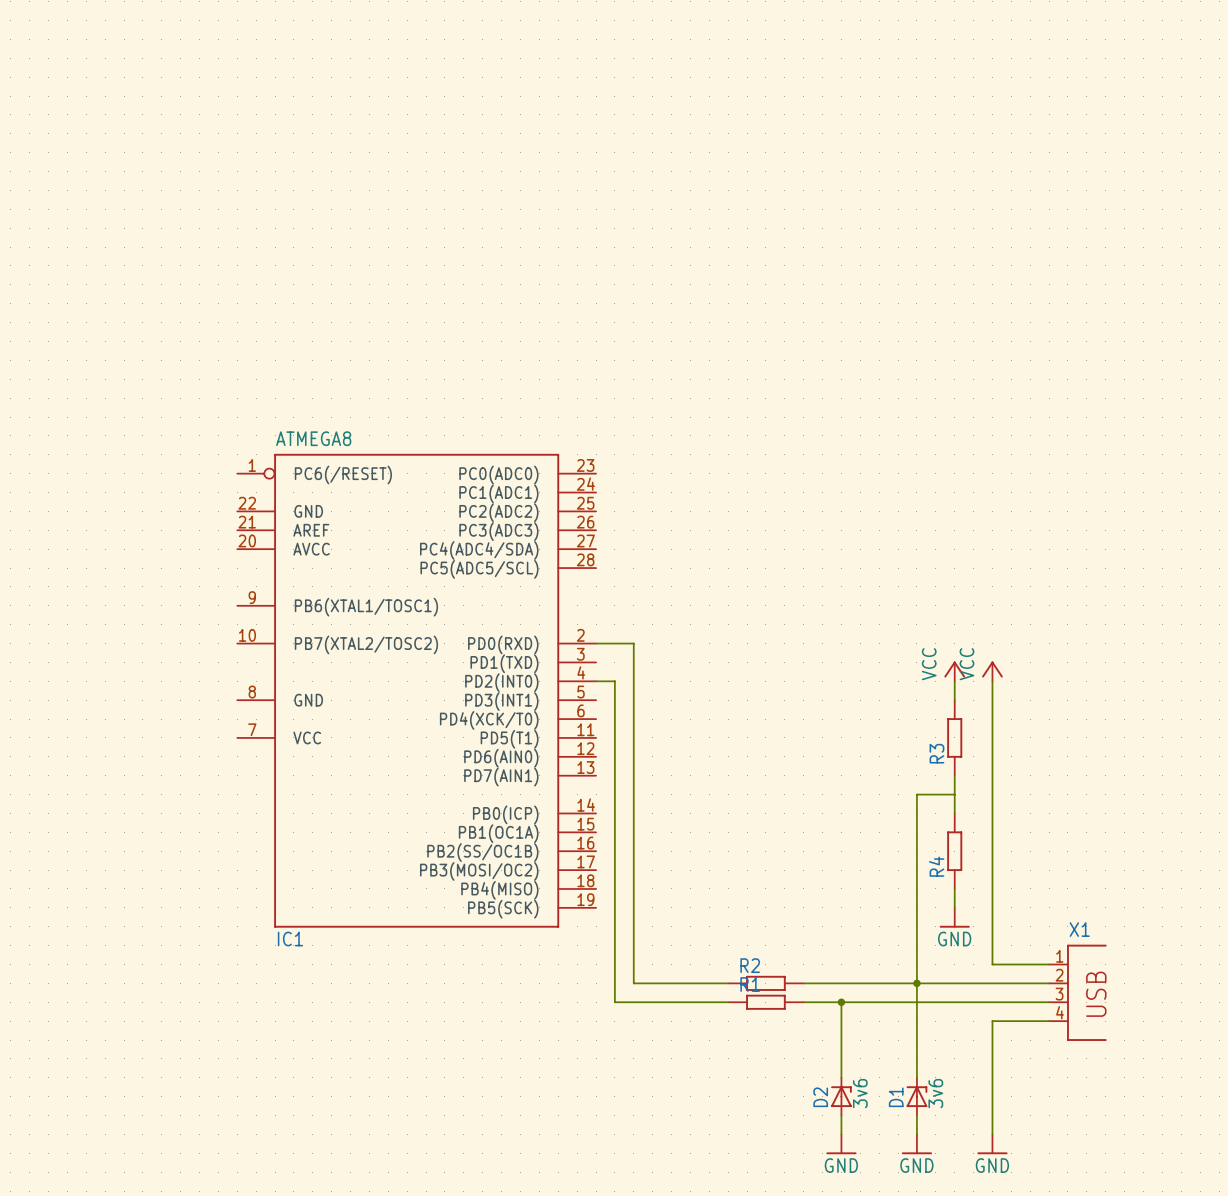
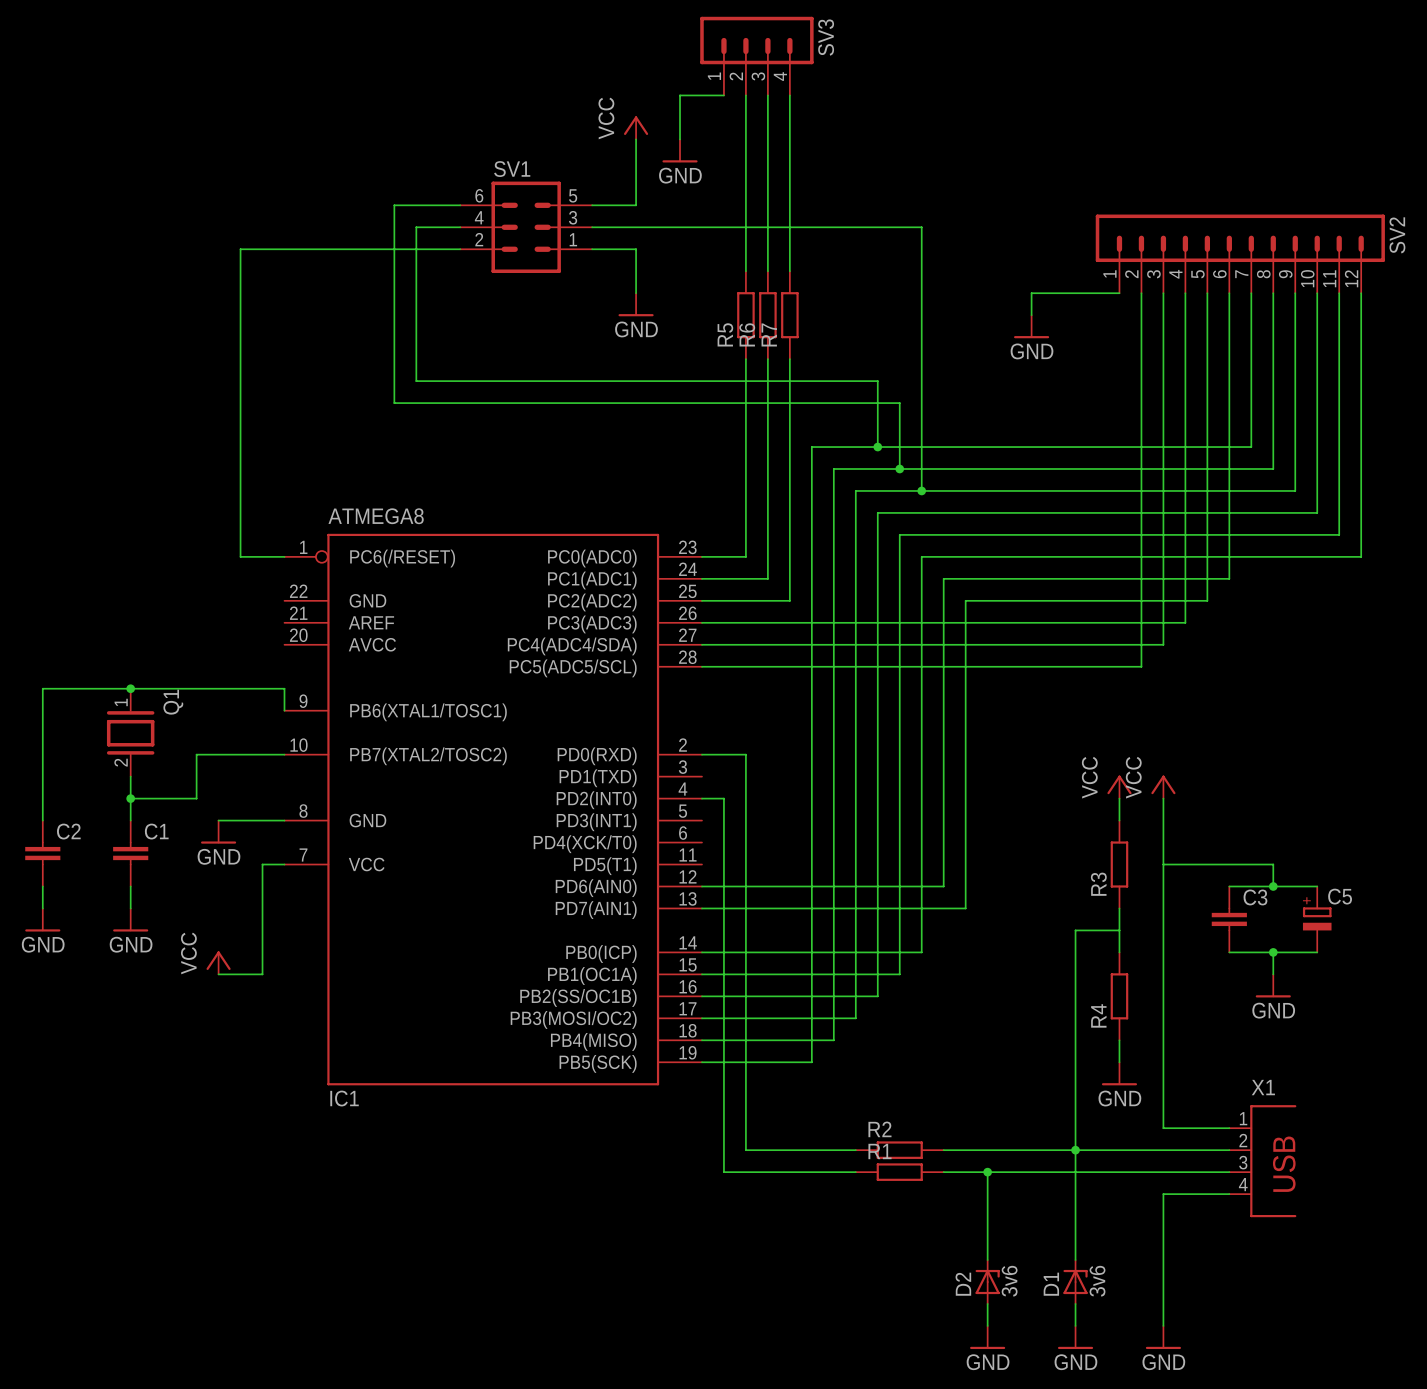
SV3: none -> (756, 56)
wire: none -> (723, 95) (680, 95) (680, 139)
wire: none -> (745, 95) (745, 271)
wire: none -> (767, 95) (767, 271)
wire: none -> (789, 95) (789, 271)
power symbol: none -> VCC (636, 127)
wire: none -> (636, 139) (636, 205) (592, 205)
power symbol: none -> GND (680, 150)
wire: none -> (460, 205) (394, 205) (394, 403) (899, 403) (899, 469)
wire: none -> (460, 227) (416, 227) (416, 381) (877, 381) (877, 447)
SV1: none -> (526, 227)
wire: none -> (592, 227) (921, 227) (921, 490)
wire: none -> (460, 249) (240, 249) (240, 556) (284, 556)
wire: none -> (592, 249) (636, 249) (636, 293)
SV2: none -> (1240, 253)
wire: none -> (1119, 293) (1031, 293) (1031, 315)
wire: none -> (1141, 293) (1141, 666) (701, 666)
wire: none -> (1163, 293) (1163, 644) (701, 644)
wire: none -> (1185, 293) (1185, 622) (701, 622)
wire: none -> (1207, 293) (1207, 600) (965, 600) (965, 908) (701, 908)
wire: none -> (1229, 293) (1229, 578) (943, 578) (943, 886) (701, 886)
wire: none -> (1251, 293) (1251, 447) (811, 447) (811, 1062) (701, 1062)
wire: none -> (1273, 293) (1273, 469) (833, 469) (833, 1040) (701, 1040)
wire: none -> (1295, 293) (1295, 490) (855, 490) (855, 1018) (701, 1018)
wire: none -> (1317, 293) (1317, 512) (877, 512) (877, 996) (701, 996)
wire: none -> (1339, 293) (1339, 534) (899, 534) (899, 974) (701, 974)
wire: none -> (1361, 293) (1361, 556) (921, 556) (921, 952) (701, 952)
power symbol: none -> GND (636, 304)
R5: none -> (745, 315)
R6: none -> (767, 315)
R7: none -> (789, 315)
power symbol: none -> GND (1031, 326)
wire: none -> (745, 359) (745, 556) (701, 556)
wire: none -> (767, 359) (767, 578) (701, 578)
wire: none -> (789, 359) (789, 600) (701, 600)
junction: none -> (877, 447)
junction: none -> (899, 469)
junction: none -> (921, 490)
junction: none -> (130, 688)
wire: none -> (284, 710) (284, 688) (42, 688) (42, 820)
Q1: none -> (130, 732)
wire: none -> (284, 754) (196, 754) (196, 798) (130, 798)
wire: none -> (130, 776) (130, 820)
junction: none -> (130, 798)
wire: none -> (218, 820) (284, 820)
power symbol: none -> GND (218, 832)
C2: none -> (42, 853)
C1: none -> (130, 853)
wire: none -> (284, 864) (262, 864) (262, 974) (218, 974)
wire: none -> (1163, 864) (1273, 864) (1273, 886)
wire: none -> (42, 886) (42, 908)
wire: none -> (130, 886) (130, 908)
wire: none -> (1229, 886) (1317, 886)
junction: none -> (1273, 886)
power symbol: none -> GND (42, 920)
power symbol: none -> GND (130, 920)
C3: none -> (1229, 919)
C5: none -> (1317, 919)
wire: none -> (1229, 952) (1317, 952)
wire: none -> (1273, 952) (1273, 974)
junction: none -> (1273, 952)
power symbol: none -> VCC (218, 962)
power symbol: none -> GND (1273, 985)

